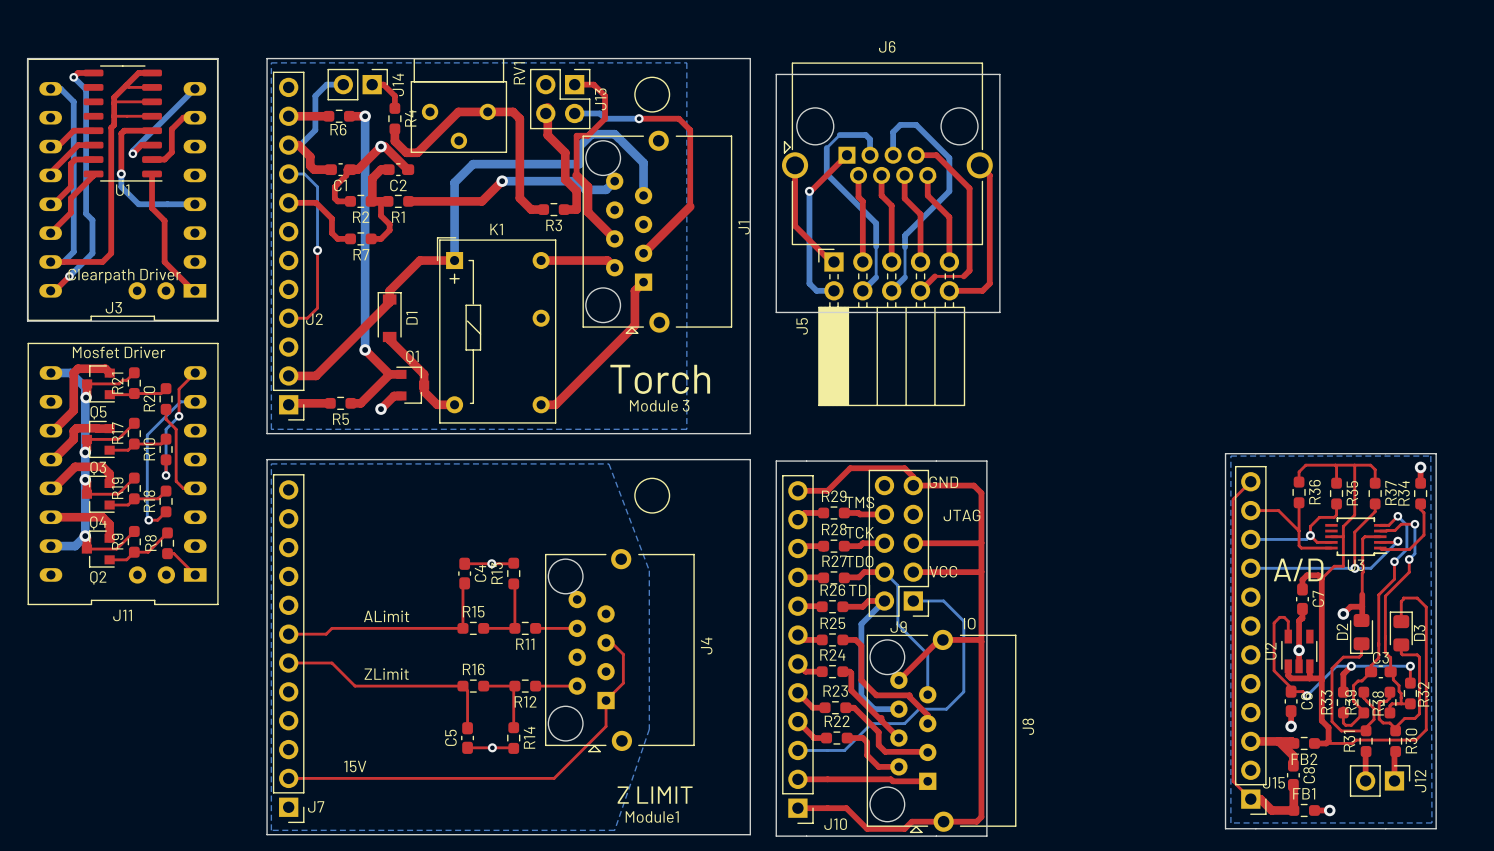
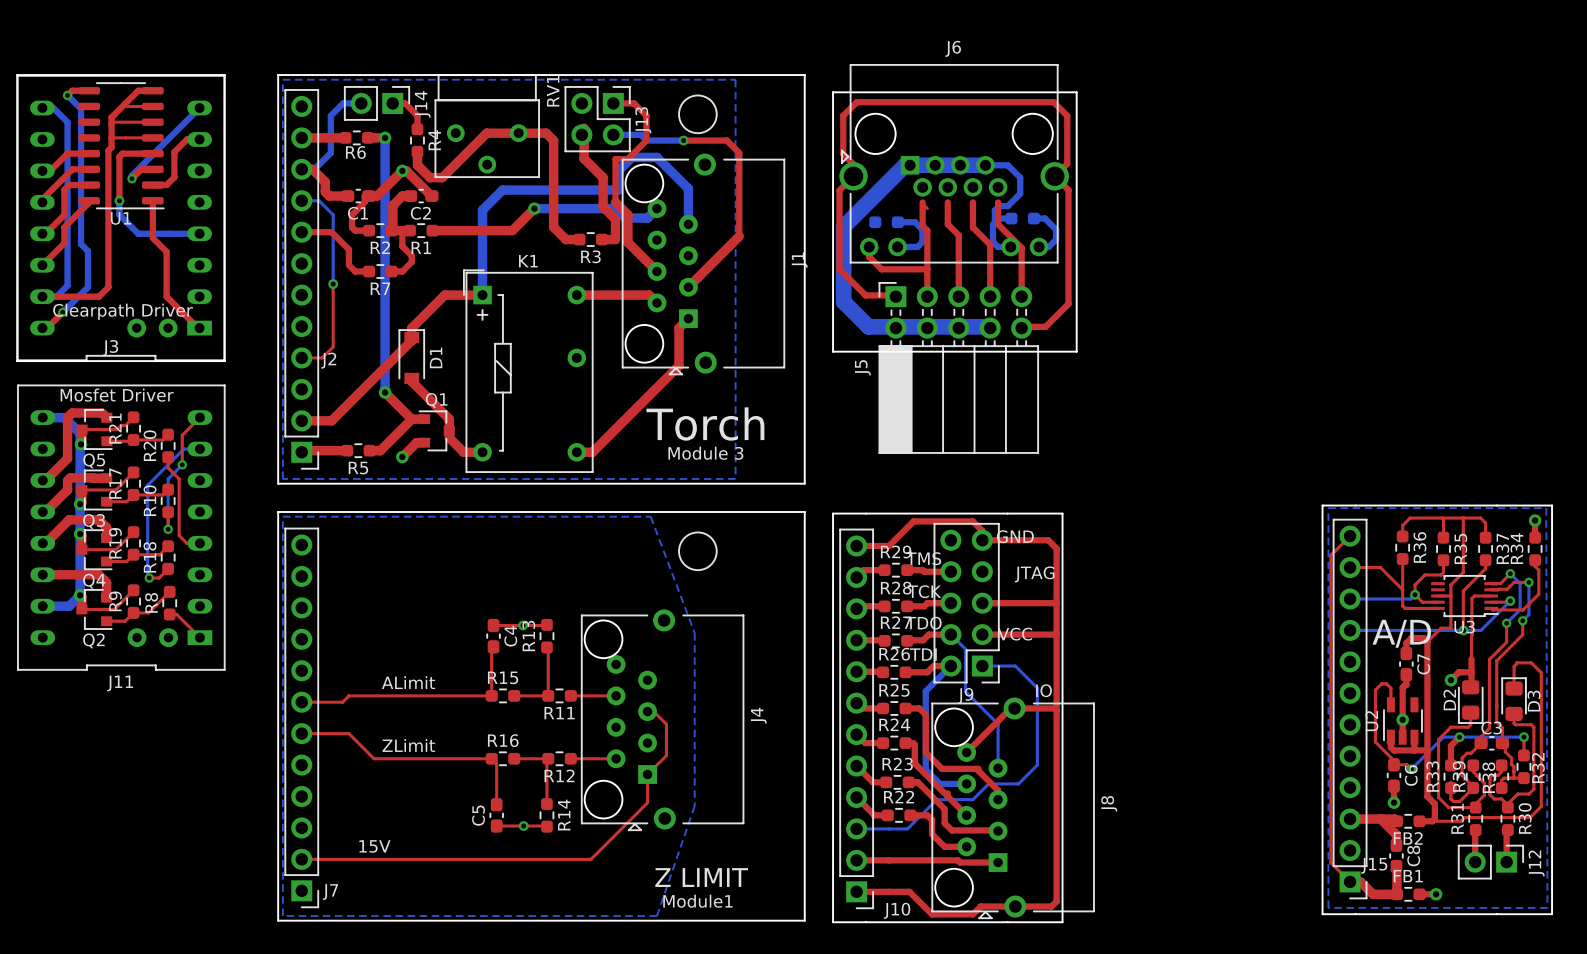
J6 footprint: [781, 62, 993, 246] -> [839, 64, 1069, 264]
top track: (846, 155) (809, 191) -> none
bottom track: (870, 155) (870, 139) (865, 135) (839, 135) (826, 148) (826, 173) (876, 223) (876, 246) -> none
bottom track: (893, 155) (893, 132) (900, 124) (916, 124) (949, 158) (949, 191) (905, 235) (905, 247) -> none
top track: (916, 155) (936, 155) (969, 188) (969, 270) (963, 276) (934, 276) (920, 290) (920, 286) -> none
top track: (795, 165) (795, 225) (831, 261) -> none
top track: (979, 165) (989, 175) (989, 283) (982, 290) (949, 290) -> none
bottom track: none -> (1011, 218) (999, 218) (993, 224) (993, 242) (997, 246) (1010, 246)
part: none -> (1022, 218)
bottom track: none -> (1034, 218) (1044, 218) (1056, 229) (1056, 239) (1048, 246) (1039, 246) (1034, 241)
bottom track: (809, 191) (809, 283) (816, 290) (833, 290) -> none
via: (809, 191) -> none
part: none -> (886, 222)
bottom track: none -> (897, 222) (915, 222) (922, 229) (922, 242) (917, 246) (897, 246)
bottom track: none -> (994, 222) (994, 210) (999, 206) (1007, 206) (1020, 193) (1020, 177) (1007, 165) (905, 165) (843, 226) (843, 301) (868, 326) (990, 326)
top track: none -> (869, 246) (869, 256) (881, 269) (927, 269)
bottom track: (876, 226) (876, 277) (862, 290) -> none
bottom track: (905, 232) (905, 277) (891, 290) -> none
top track: none -> (895, 295) (865, 295) (839, 269) (839, 190) (853, 176) (853, 164) (843, 154) (843, 115) (856, 102) (1053, 102) (1067, 115) (1067, 163) (1054, 176) (1068, 190) (1068, 303) (1045, 326) (1021, 326)

